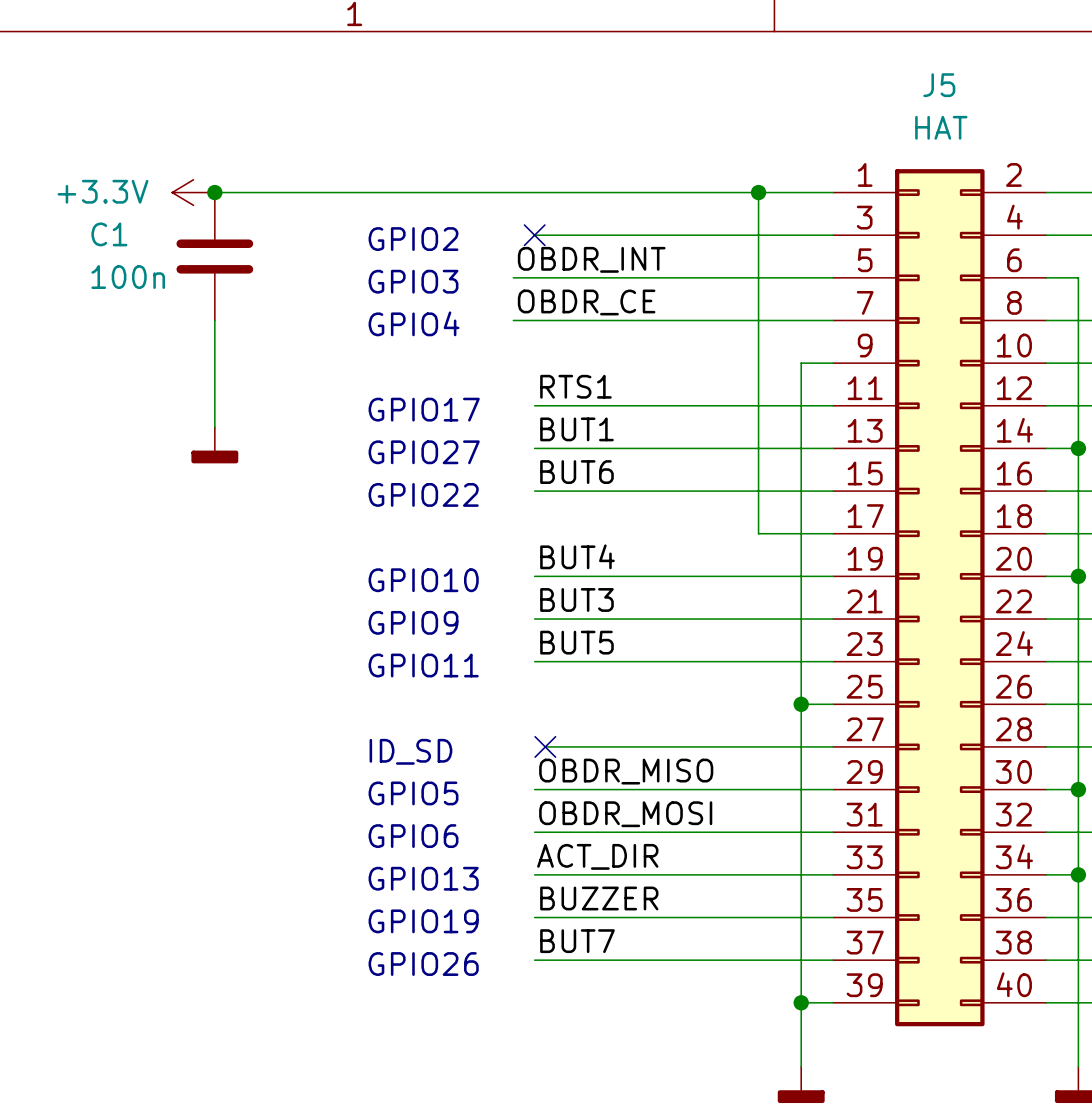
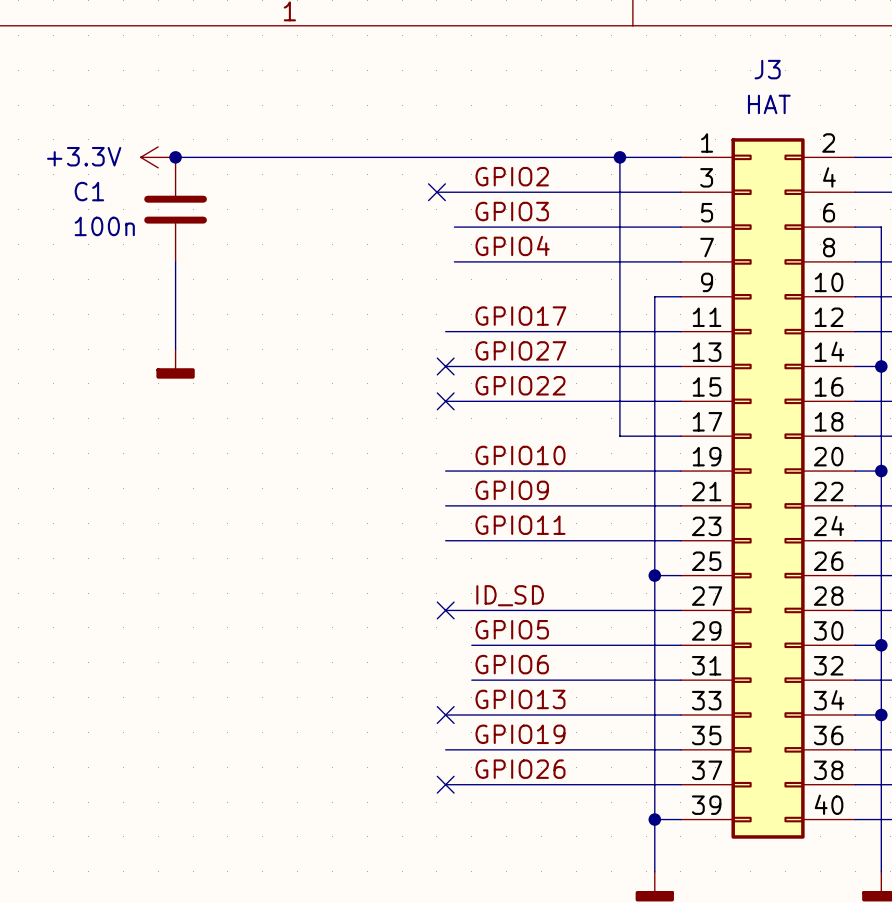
J5 name: J5 (939, 85) -> J3 (767, 69)
label: none -> GPIO2 (512, 176)
text: GPIO2 (413, 239) -> none
label: none -> GPIO3 (512, 211)
label: OBDR_INT (591, 259) -> none
wire: (513, 277) (555, 277) -> none
text: GPIO3 (413, 281) -> none
label: none -> GPIO4 (512, 245)
label: OBDR_CE (586, 302) -> none
wire: (513, 320) (555, 320) -> none
text: GPIO4 (414, 323) -> none
label: RTS1 (575, 386) -> none
label: none -> GPIO17 (520, 316)
wire: (534, 405) (545, 405) -> none
text: GPIO17 (424, 409) -> none
label: BUT1 (576, 429) -> none
label: none -> GPIO27 (520, 350)
wire: (534, 448) (545, 448) -> none
no-connect mark: none -> (445, 366)
text: GPIO27 (424, 452) -> none
label: BUT6 (576, 472) -> none
label: none -> GPIO22 (520, 385)
wire: (534, 491) (545, 491) -> none
no-connect mark: none -> (445, 401)
text: GPIO22 (423, 494) -> none
label: BUT4 (577, 556) -> none
label: none -> GPIO10 (520, 455)
wire: (534, 576) (545, 576) -> none
text: GPIO10 (423, 580) -> none
label: BUT3 (576, 599) -> none
label: none -> GPIO9 (512, 490)
wire: (534, 619) (545, 619) -> none
text: GPIO9 (413, 622) -> none
label: BUT5 (576, 642) -> none
label: none -> GPIO11 (520, 525)
wire: (534, 661) (545, 661) -> none
text: GPIO11 (423, 665) -> none
label: none -> ID_SD (510, 595)
text: ID_SD (410, 751) -> none
label: none -> GPIO5 (512, 629)
label: OBDR_MISO (626, 771) -> none
wire: (534, 789) (577, 789) -> none
text: GPIO5 (413, 793) -> none
label: none -> GPIO6 (512, 664)
label: OBDR_MOSI (625, 814) -> none
wire: (534, 832) (577, 832) -> none
text: GPIO6 (413, 836) -> none
label: none -> GPIO13 (520, 699)
label: ACT_DIR (597, 856) -> none
wire: (534, 874) (545, 874) -> none
no-connect mark: none -> (445, 714)
text: GPIO13 (423, 878) -> none
label: BUZZER (599, 898) -> none
label: none -> GPIO19 (520, 734)
wire: (534, 917) (545, 917) -> none
text: GPIO19 (423, 921) -> none
label: BUT7 (577, 941) -> none
label: none -> GPIO26 (520, 769)
wire: (534, 960) (545, 960) -> none
no-connect mark: none -> (445, 784)
text: GPIO26 (423, 964) -> none

